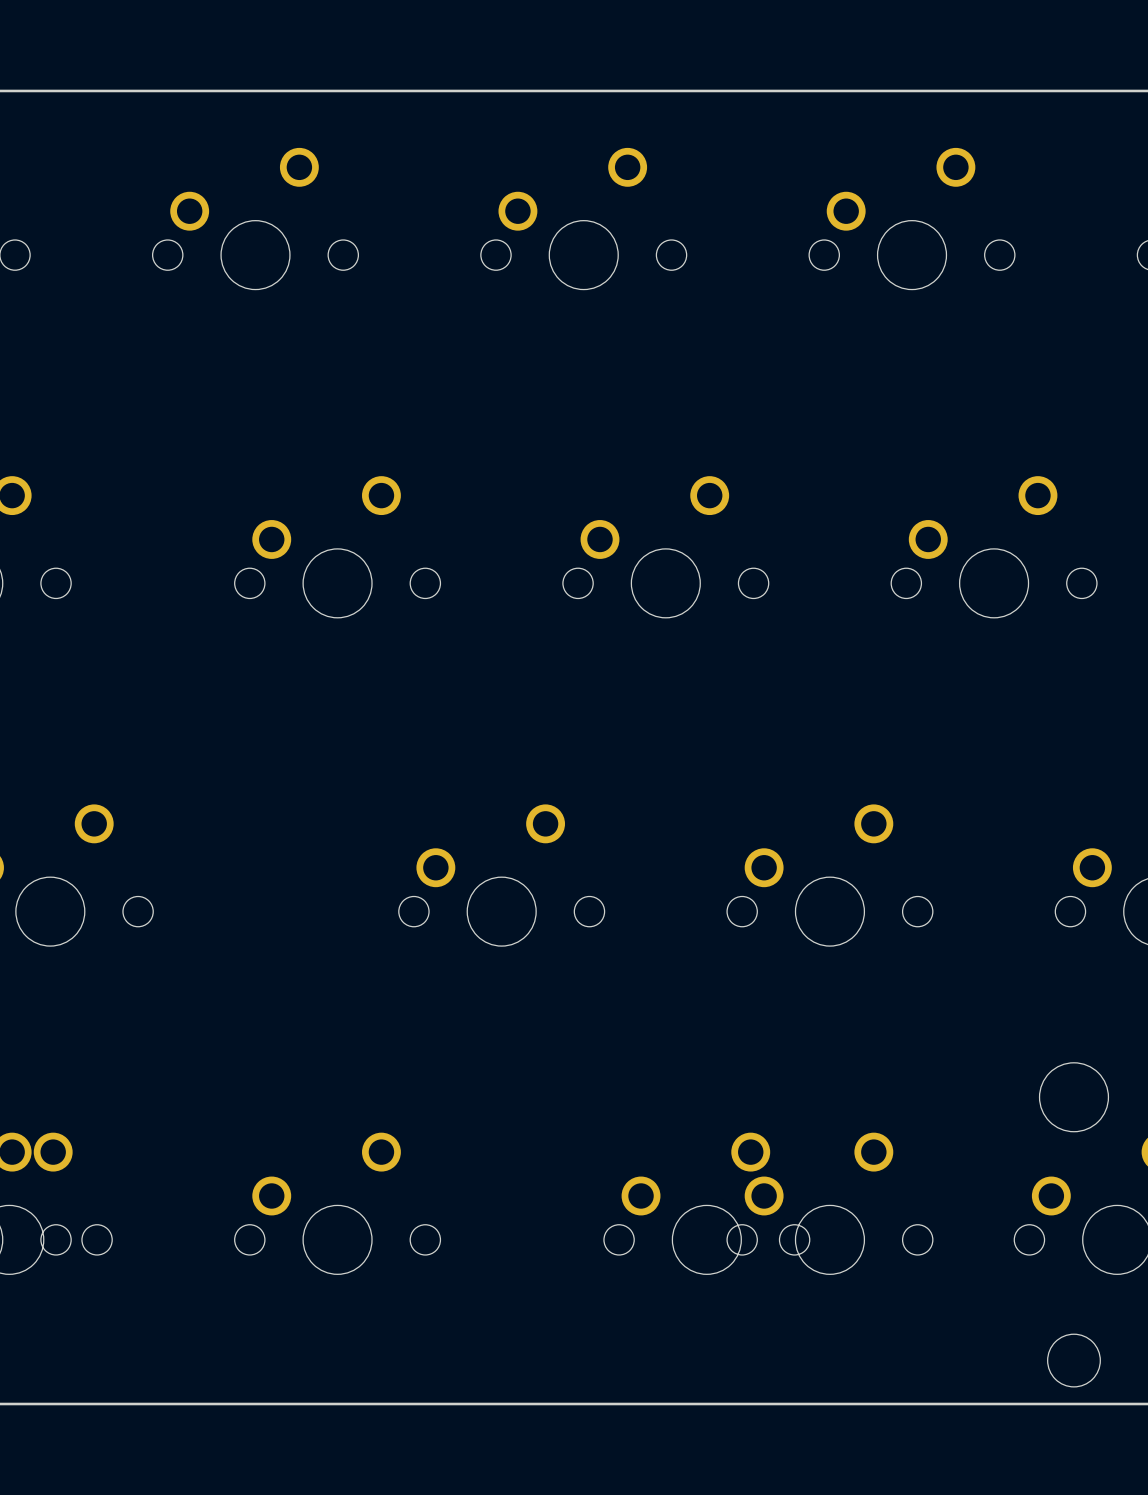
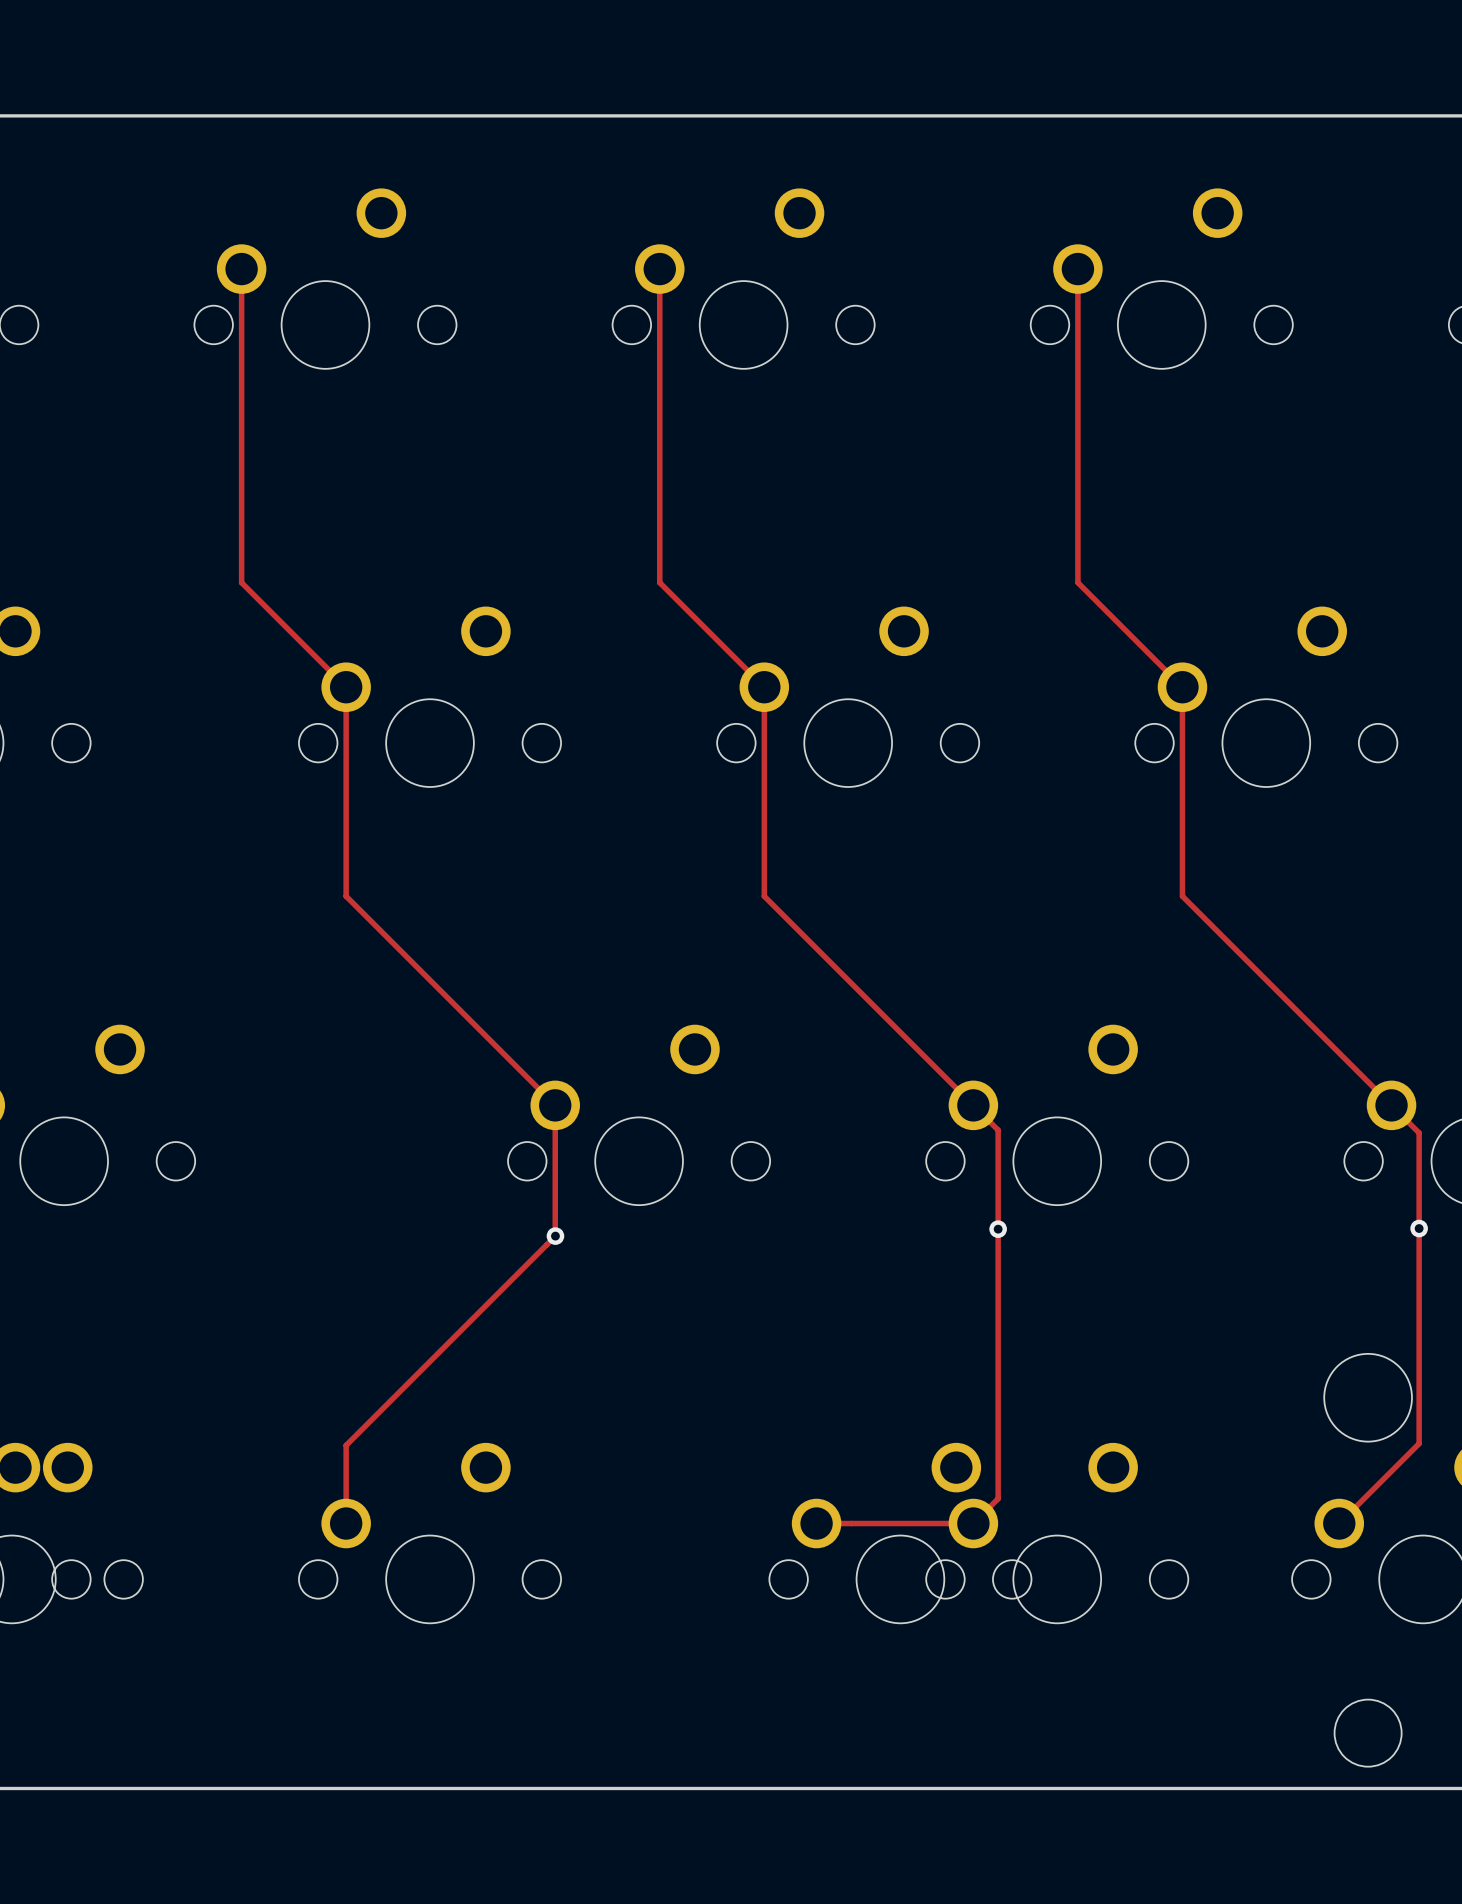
track: none -> (241, 269) (241, 582) (346, 687) (346, 896) (555, 1105) (555, 1235)
track: none -> (659, 269) (659, 582) (764, 687) (764, 896) (998, 1130) (998, 1498) (973, 1523) (816, 1523)
track: none -> (1077, 269) (1077, 582) (1182, 687) (1182, 896) (1419, 1132) (1419, 1443) (1339, 1523)
via: none -> (998, 1229)
via: none -> (1419, 1228)
track: none -> (555, 1236) (346, 1445) (346, 1523)
via: none -> (555, 1236)

